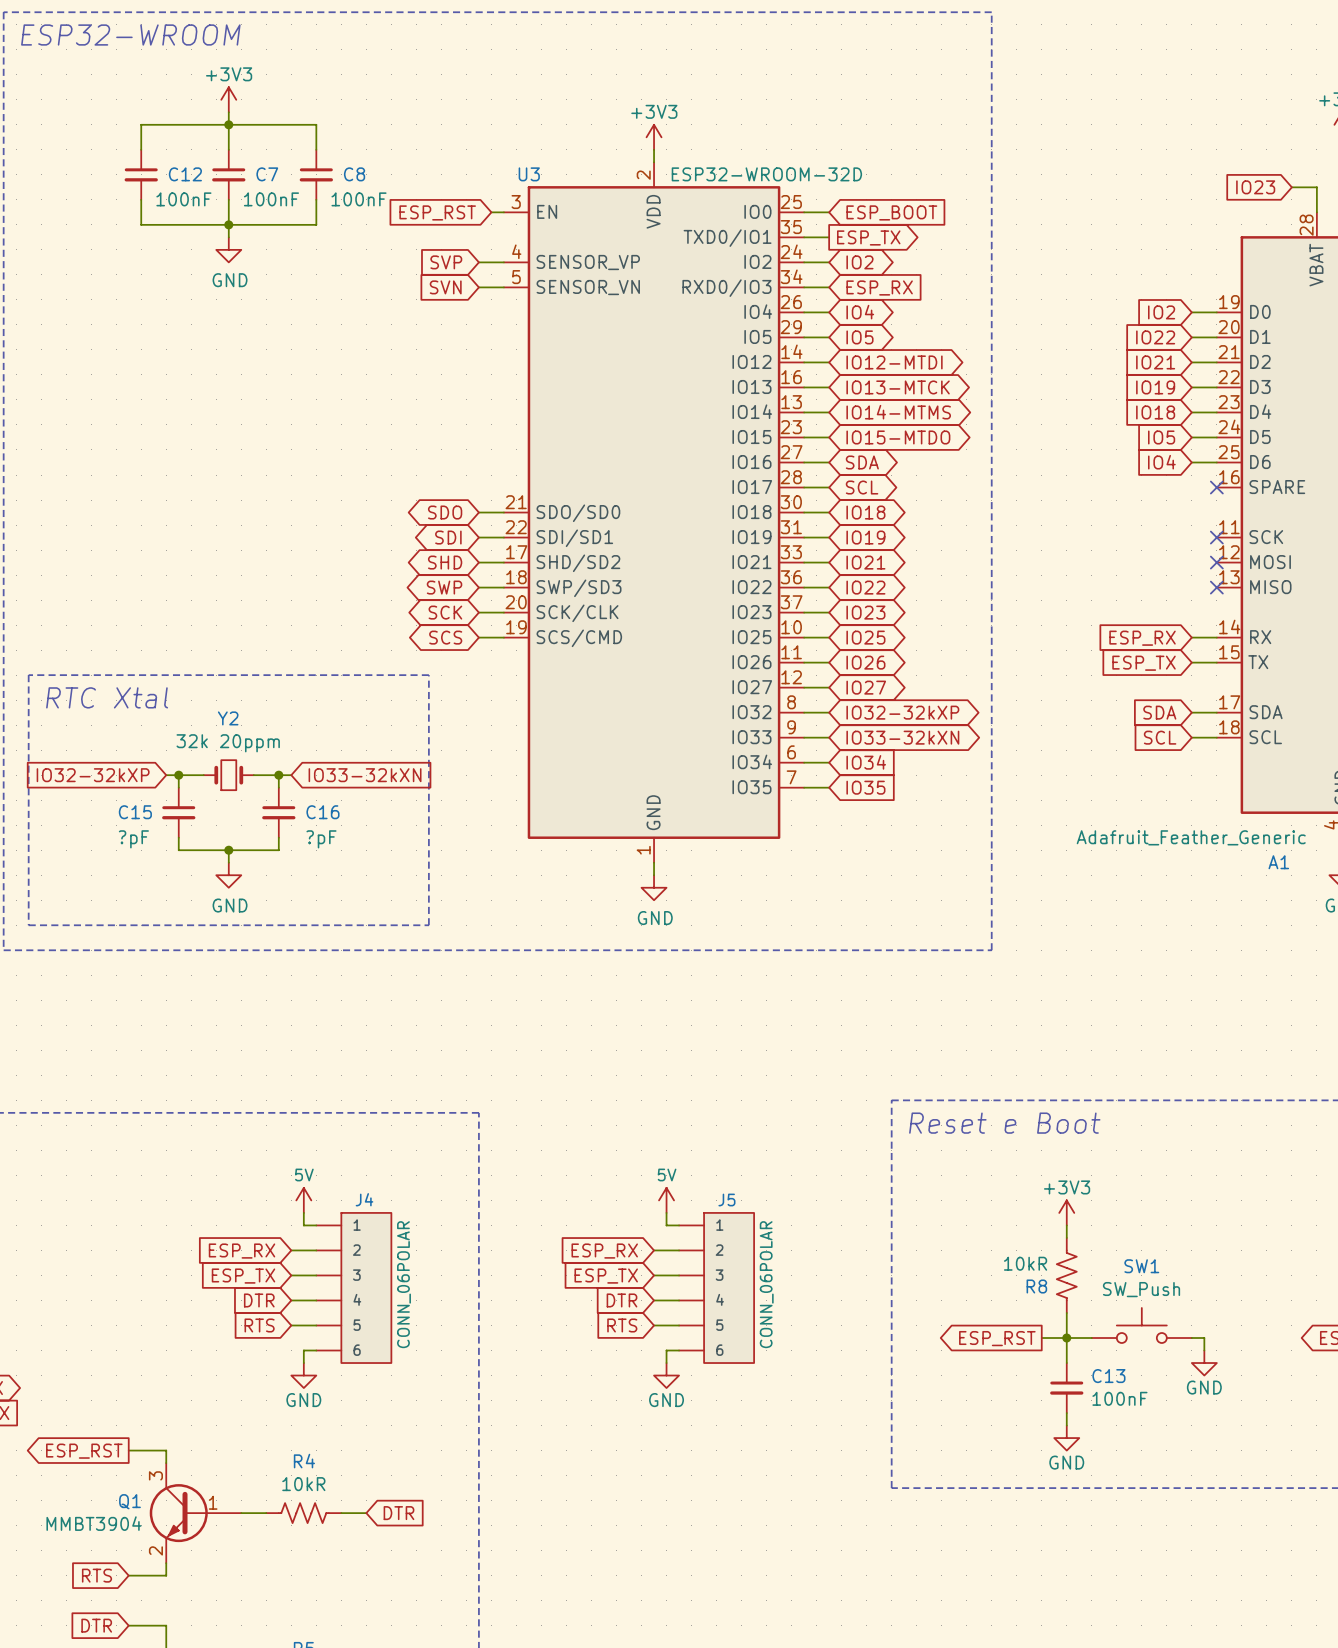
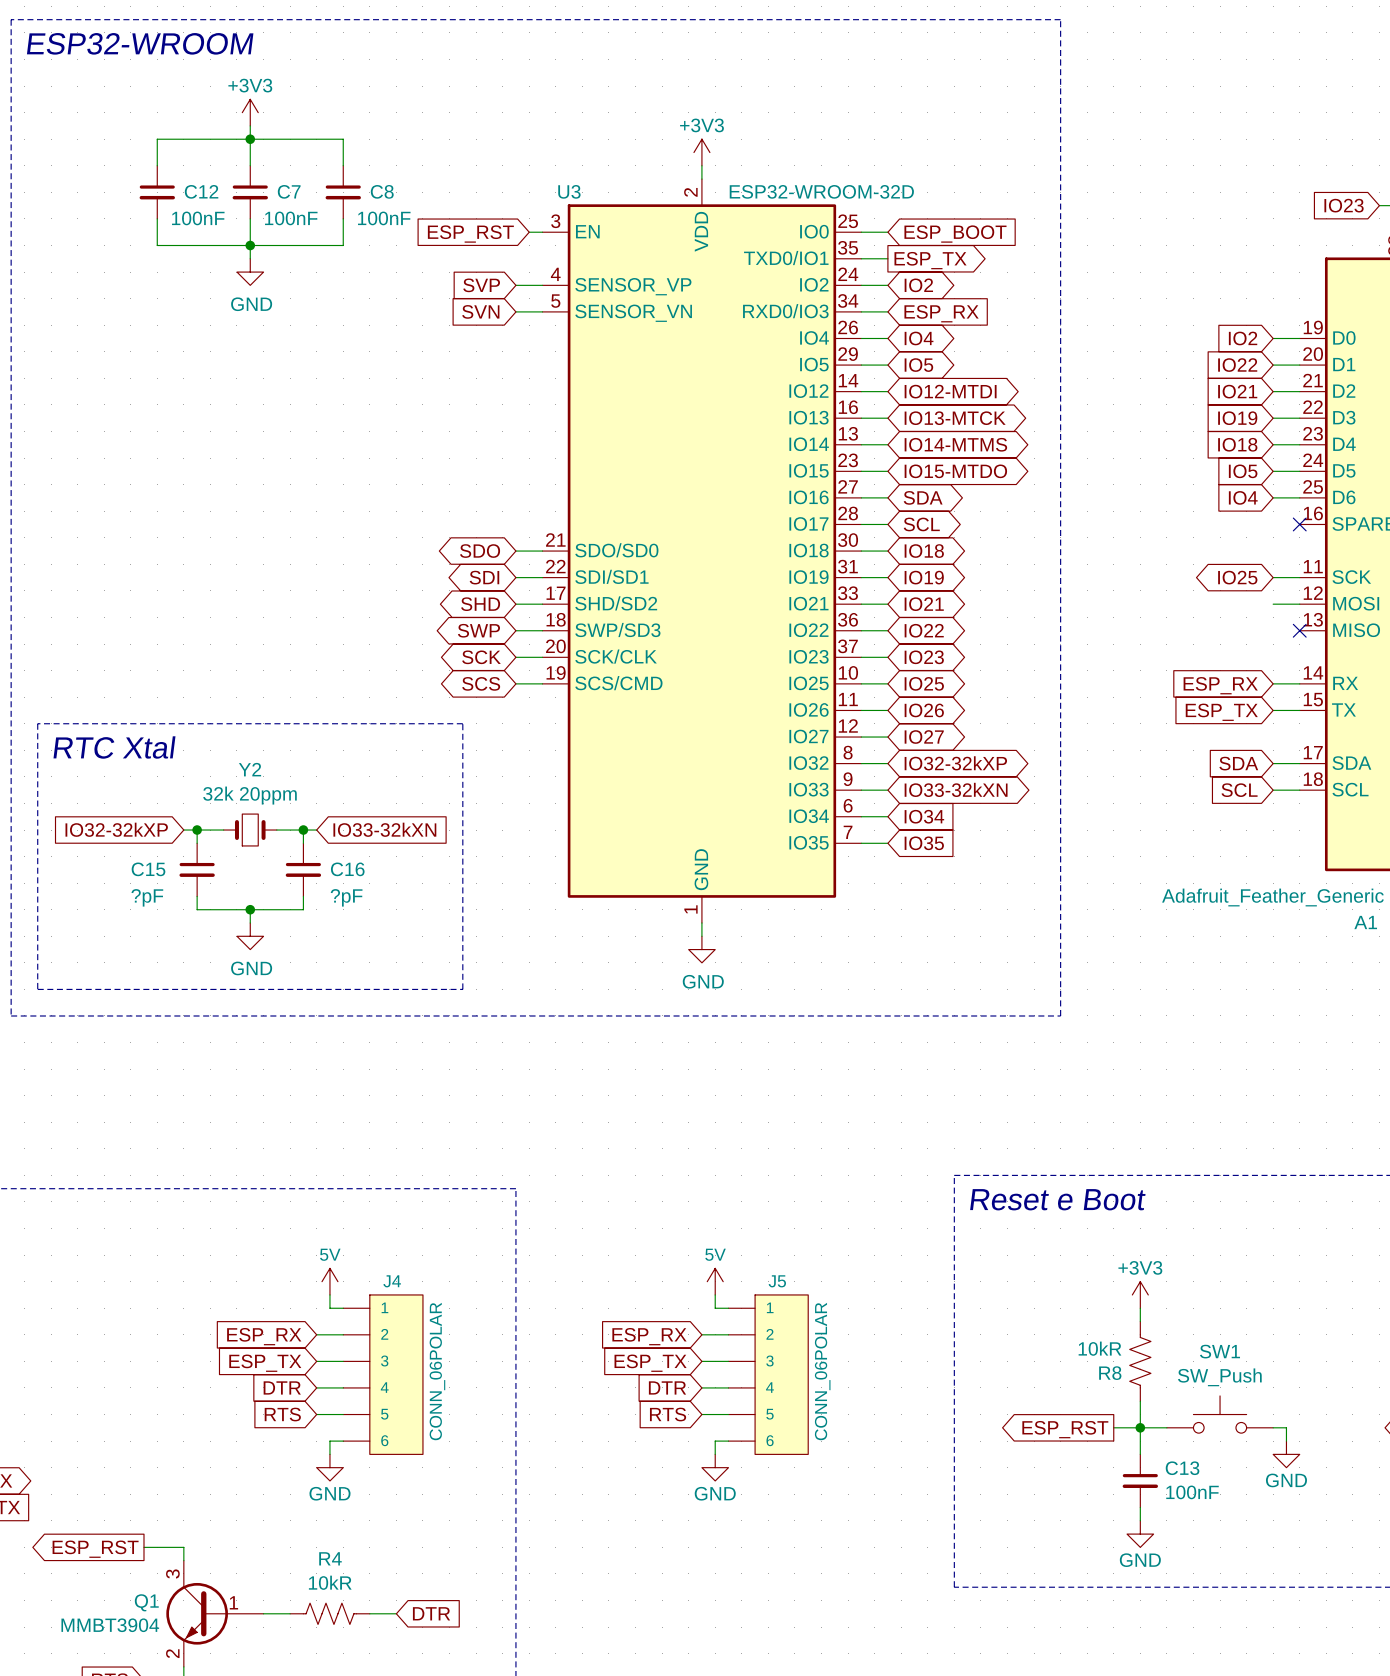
global label: none -> IO25 (1237, 577)
wire: none -> (1273, 577) (1299, 577)
no-connect mark: (1216, 537) -> none
wire: none -> (1273, 604) (1299, 604)
no-connect mark: (1216, 562) -> none

